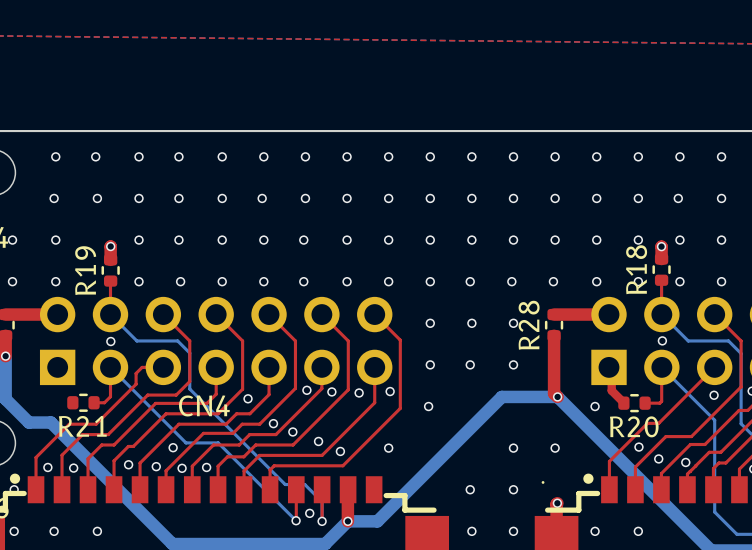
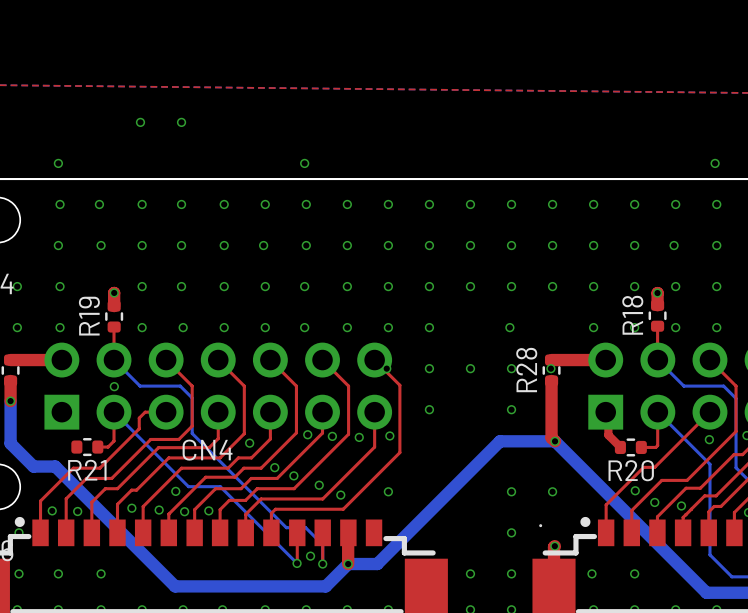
via: none -> (140, 122)
via: none -> (181, 122)
via: none -> (58, 163)
via: none -> (304, 163)
via: none -> (715, 163)
via: (470, 281) -> none
via position: (553, 281) -> (550, 368)
via: none -> (386, 368)
via: (662, 340) -> none
via: (470, 364) -> none
via: (428, 406) -> none
via: (595, 406) -> none
via: (470, 489) -> none

